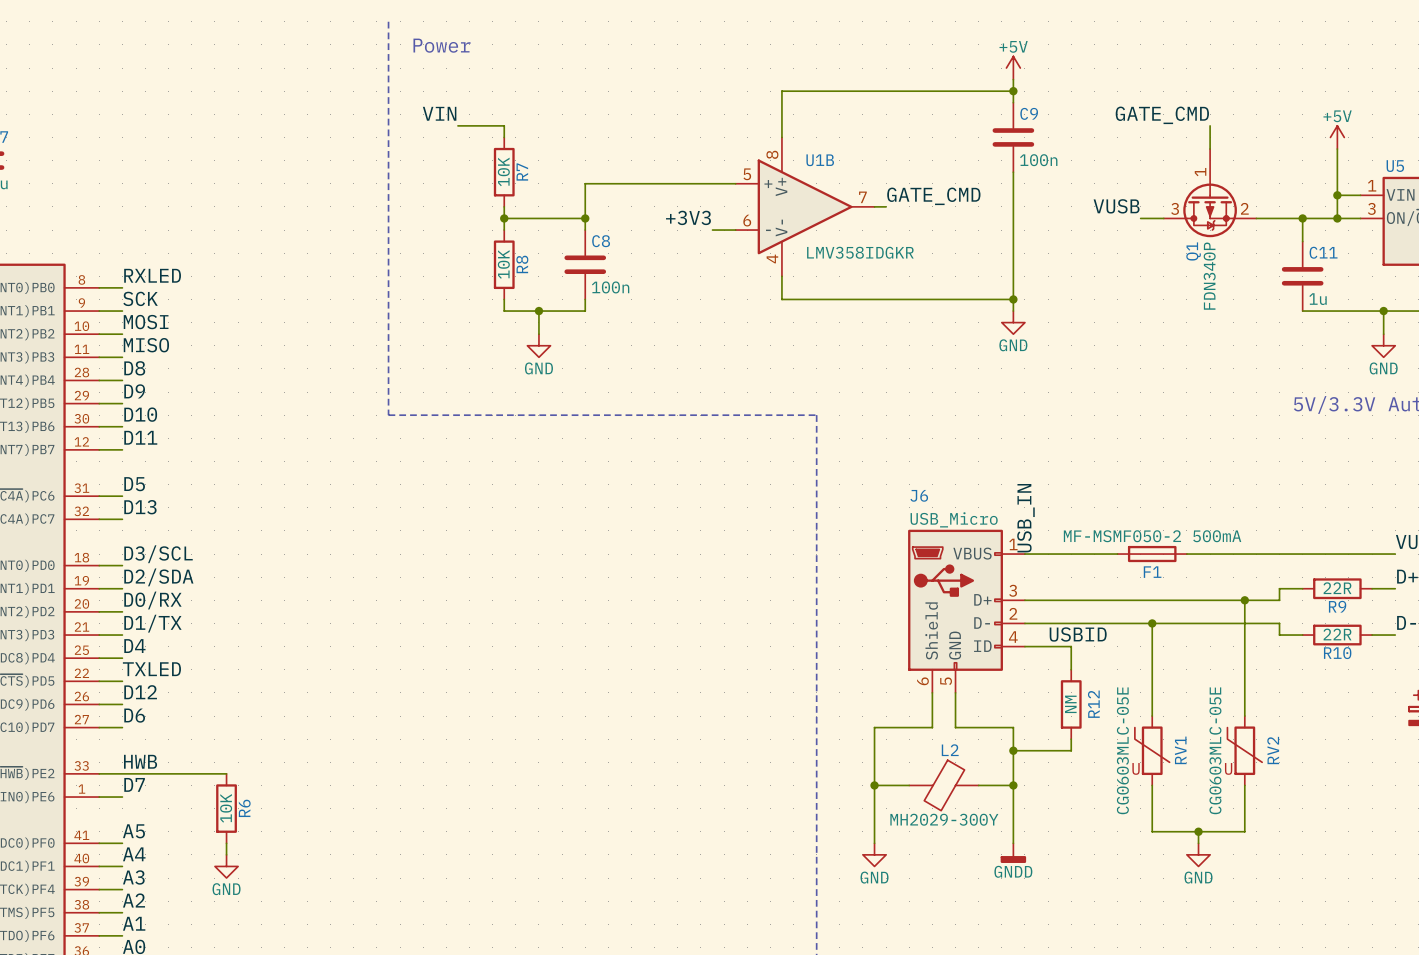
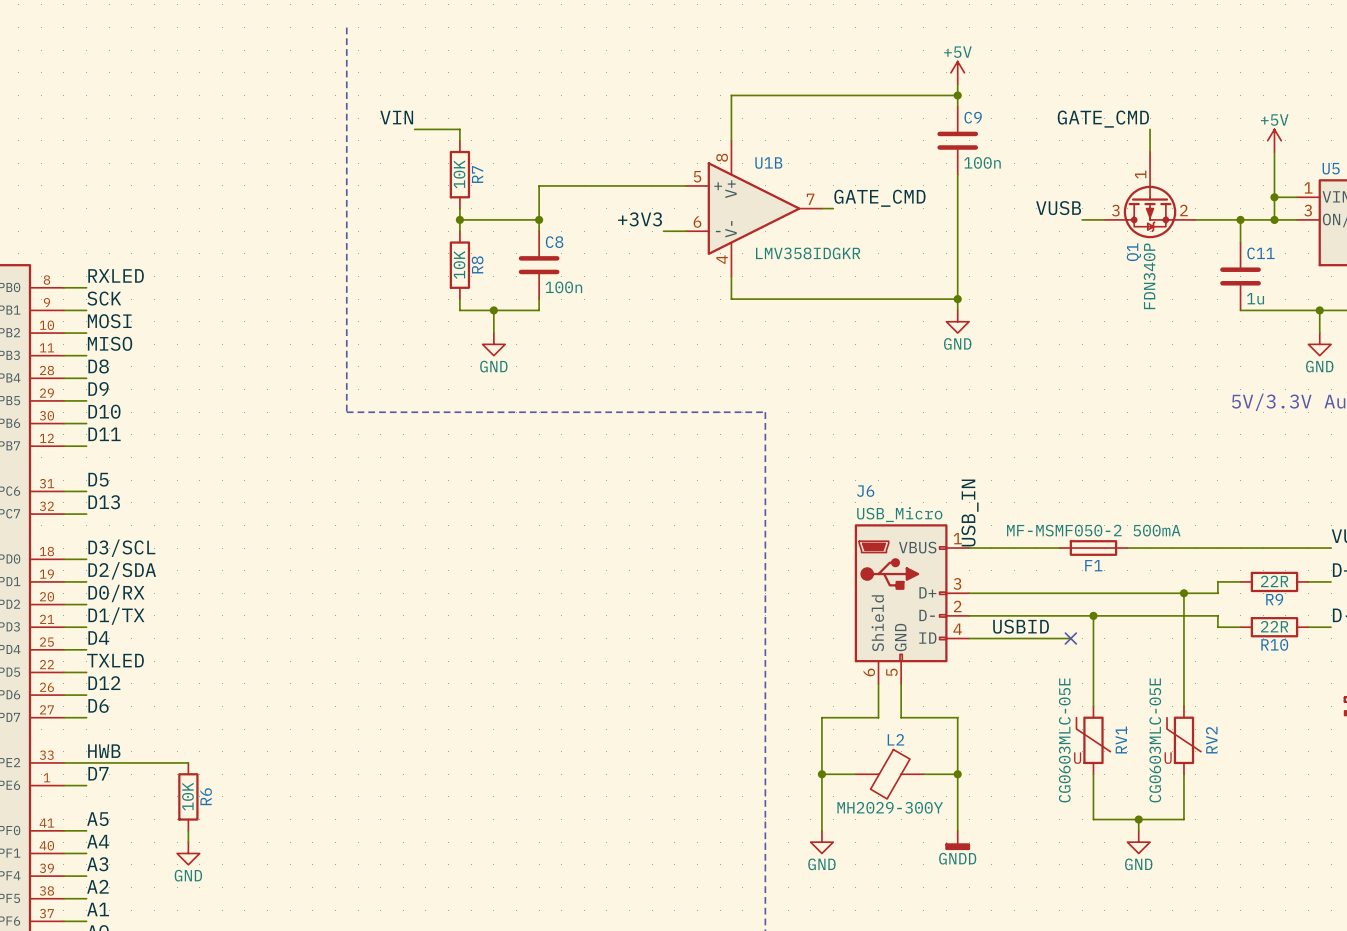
text: Power (442, 45) -> none
wire: (1071, 646) (1071, 669) -> (1014, 638) (1070, 638)
no-connect mark: none -> (1070, 638)
R12: NM (1071, 704) -> none
wire: (1071, 739) (1071, 750) (1013, 750) -> none
junction: (1013, 750) -> none

